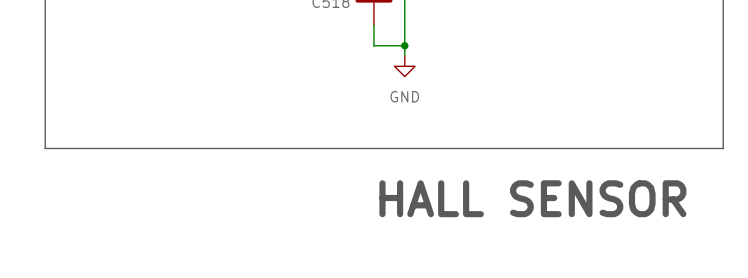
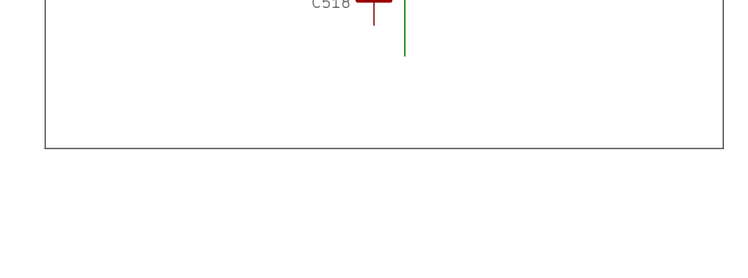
wire: (373, 25) (373, 45) (404, 45) -> none
junction: (404, 45) -> none
power symbol: GND (404, 66) -> none
text: HALL SENSOR (532, 198) -> none

